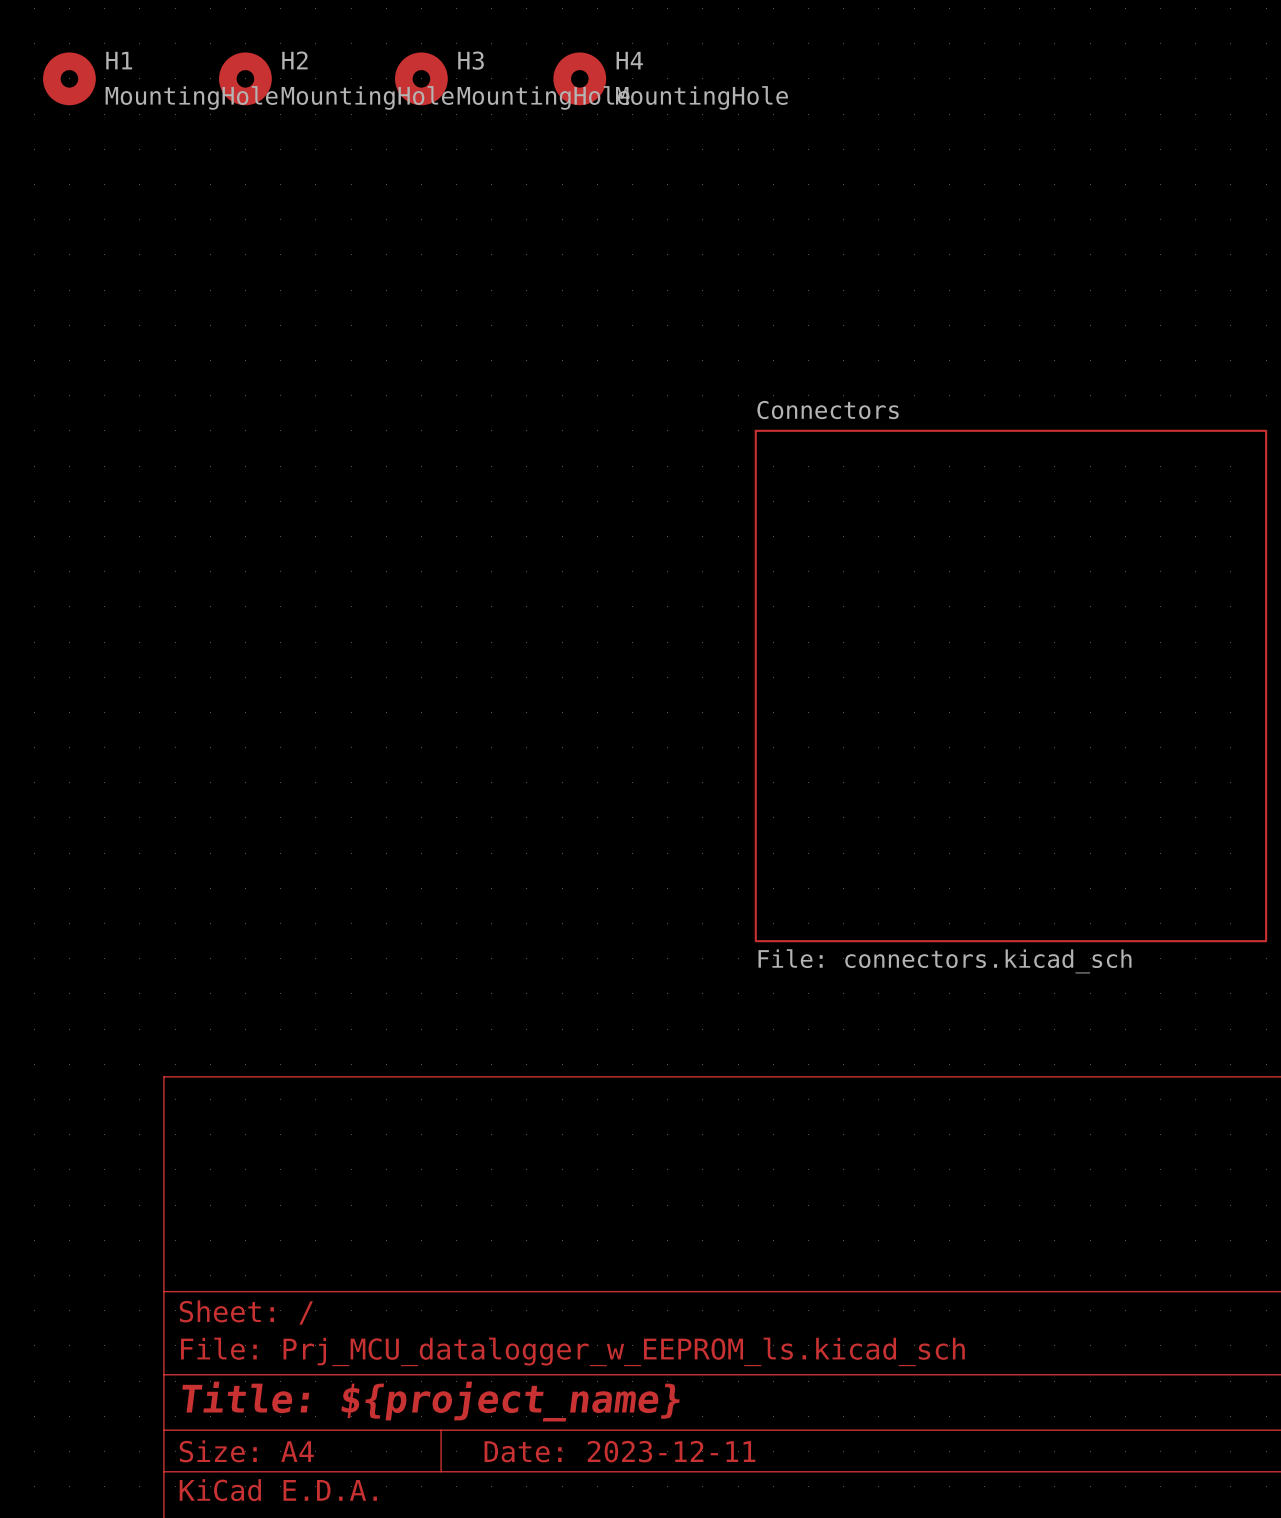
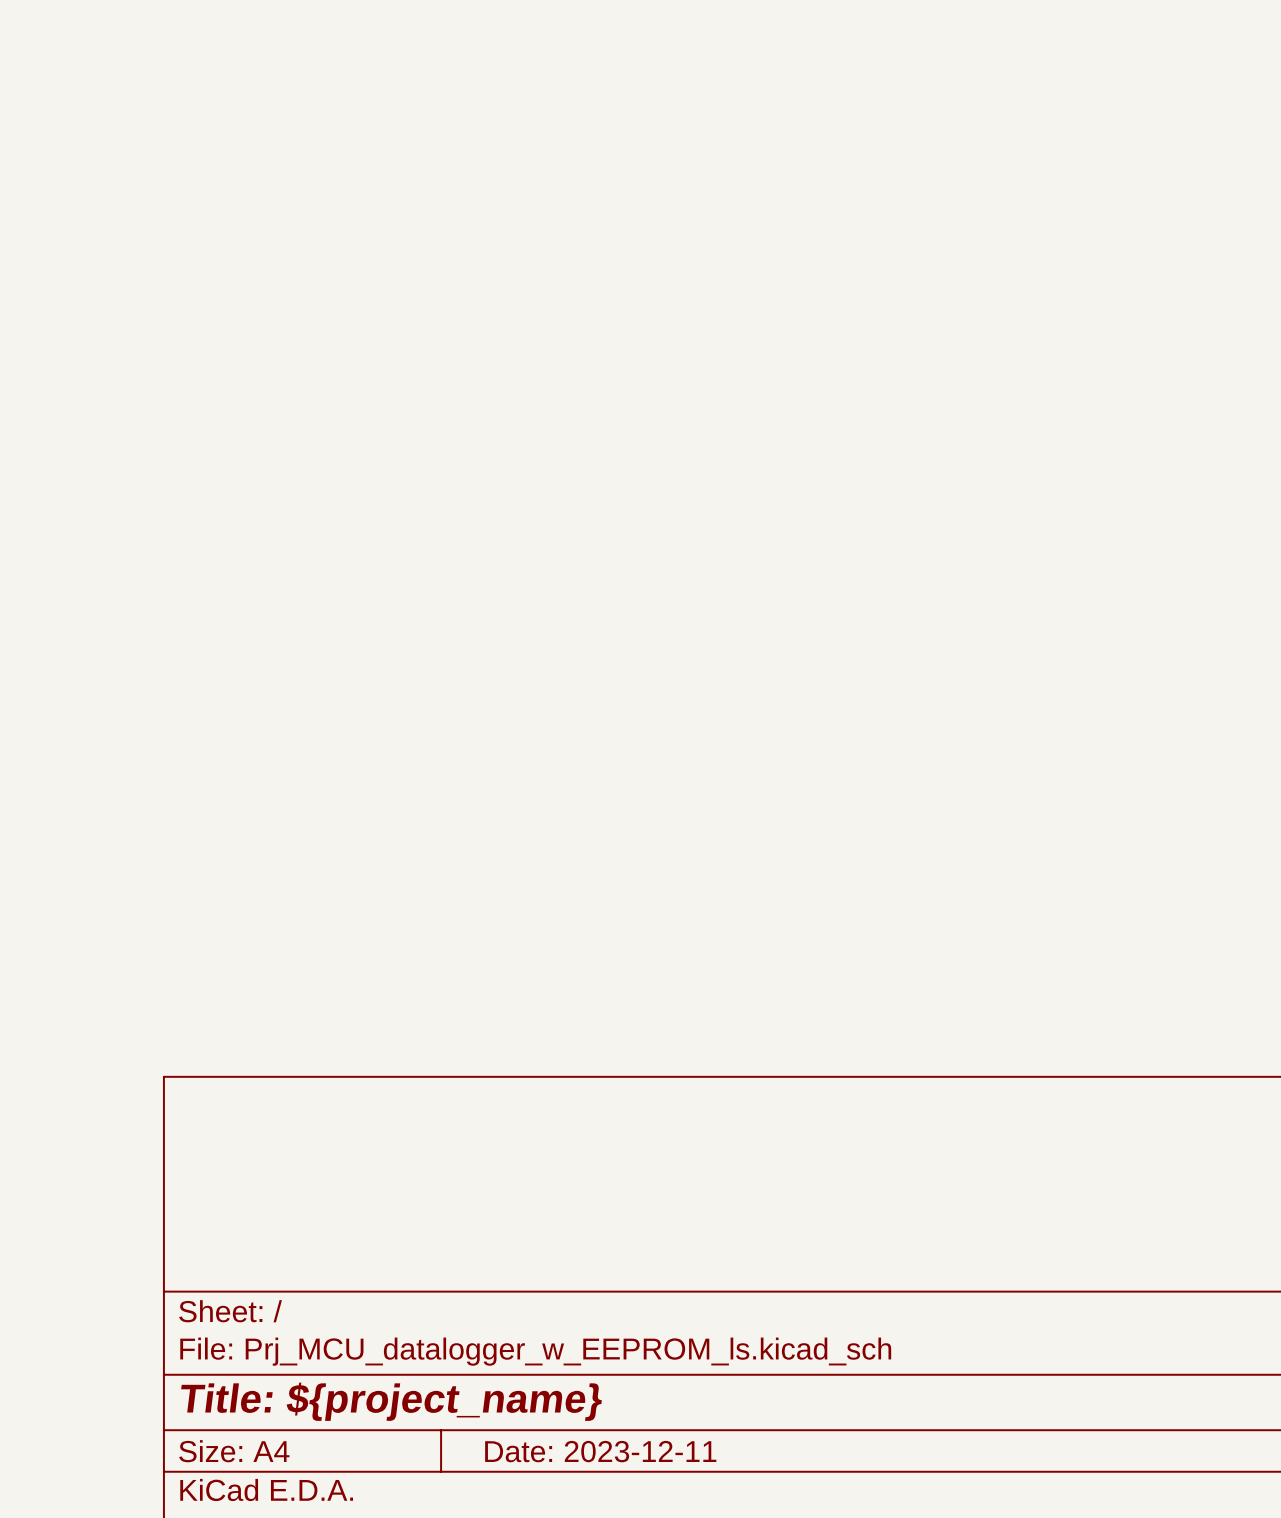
H1: MountingHole (69, 78) -> none
H2: MountingHole (245, 78) -> none
H3: MountingHole (421, 78) -> none
H4: MountingHole (579, 78) -> none
sheet Connectors: File: connectors.kicad_sch (1010, 686) -> none

